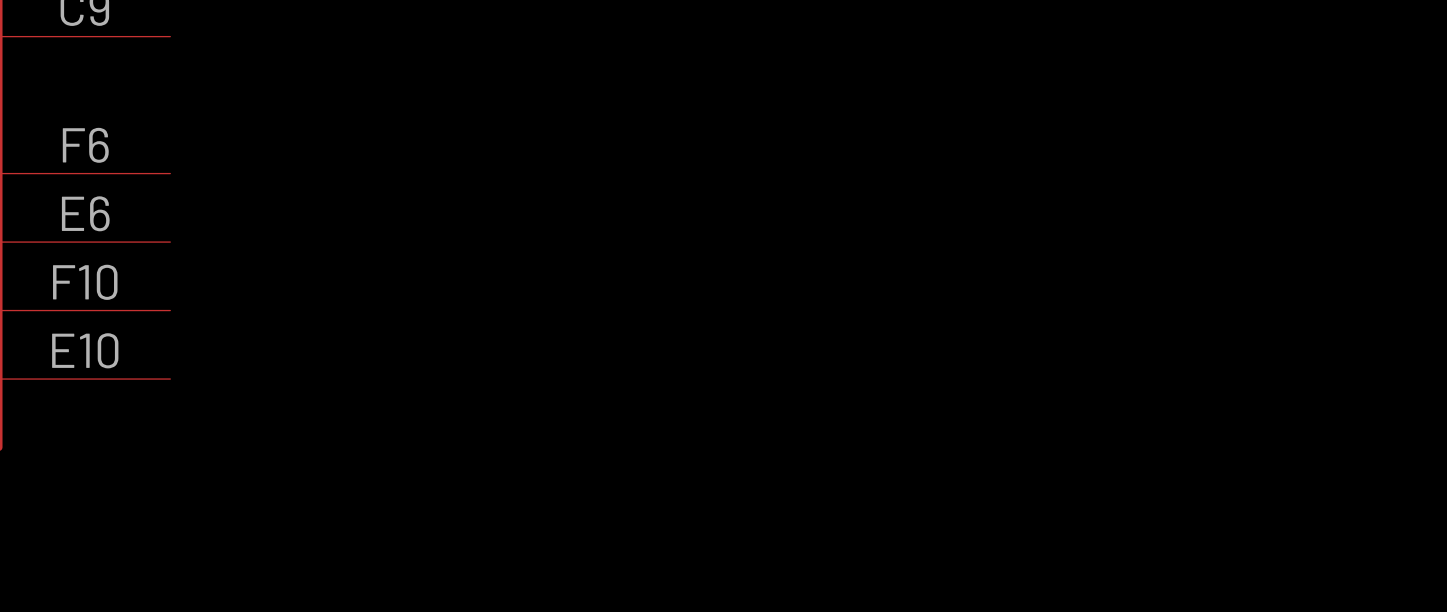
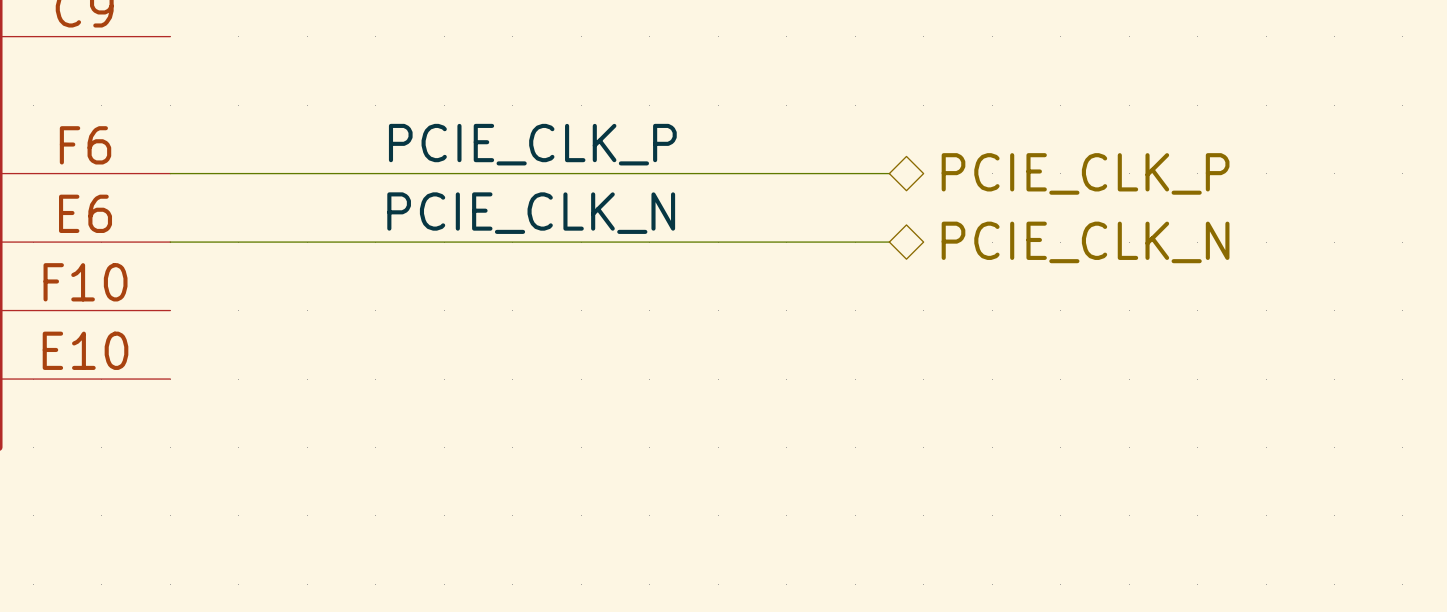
label: none -> PCIE_CLK_P (532, 144)
hierarchical label: none -> PCIE_CLK_P (1085, 173)
wire: none -> (170, 173) (889, 173)
label: none -> PCIE_CLK_N (531, 213)
hierarchical label: none -> PCIE_CLK_N (1085, 242)
wire: none -> (170, 242) (889, 242)

